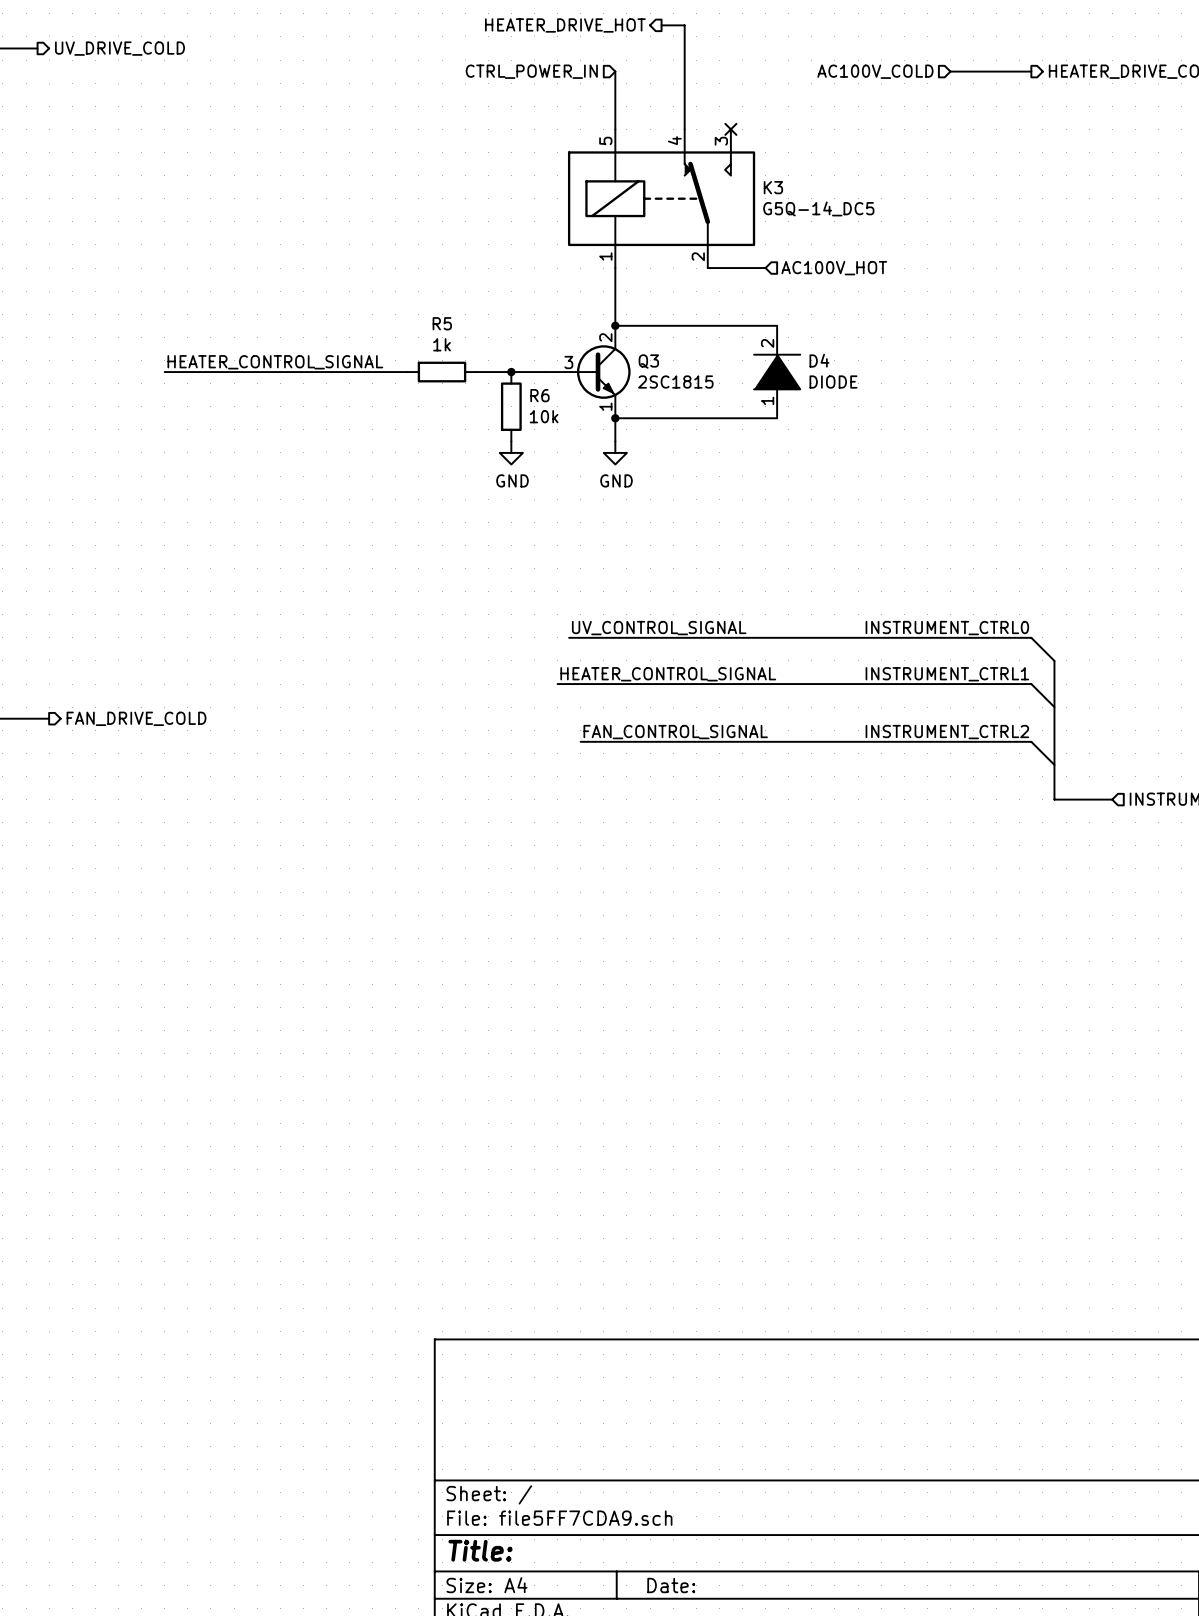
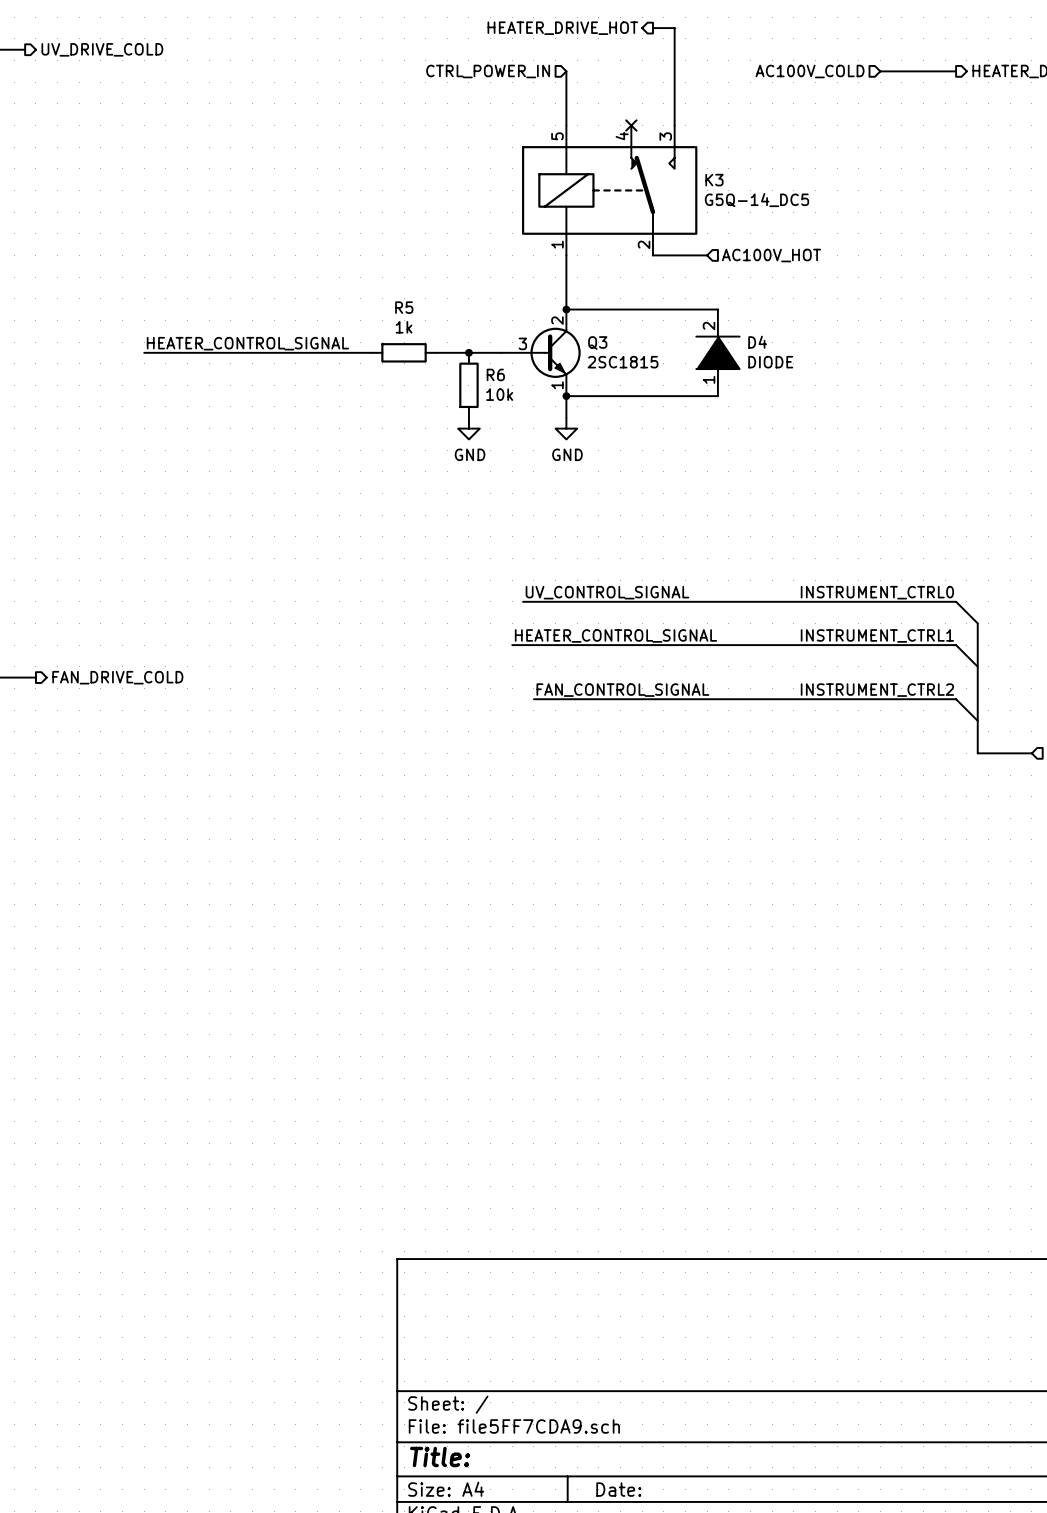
hierarchical label position: HEATER_DRIVE_HOT (565, 25) -> HEATER_DRIVE_HOT (562, 28)
wire: (661, 25) (684, 25) (684, 129) -> (652, 28) (674, 28) (674, 125)
no-connect mark position: (730, 129) -> (631, 125)

